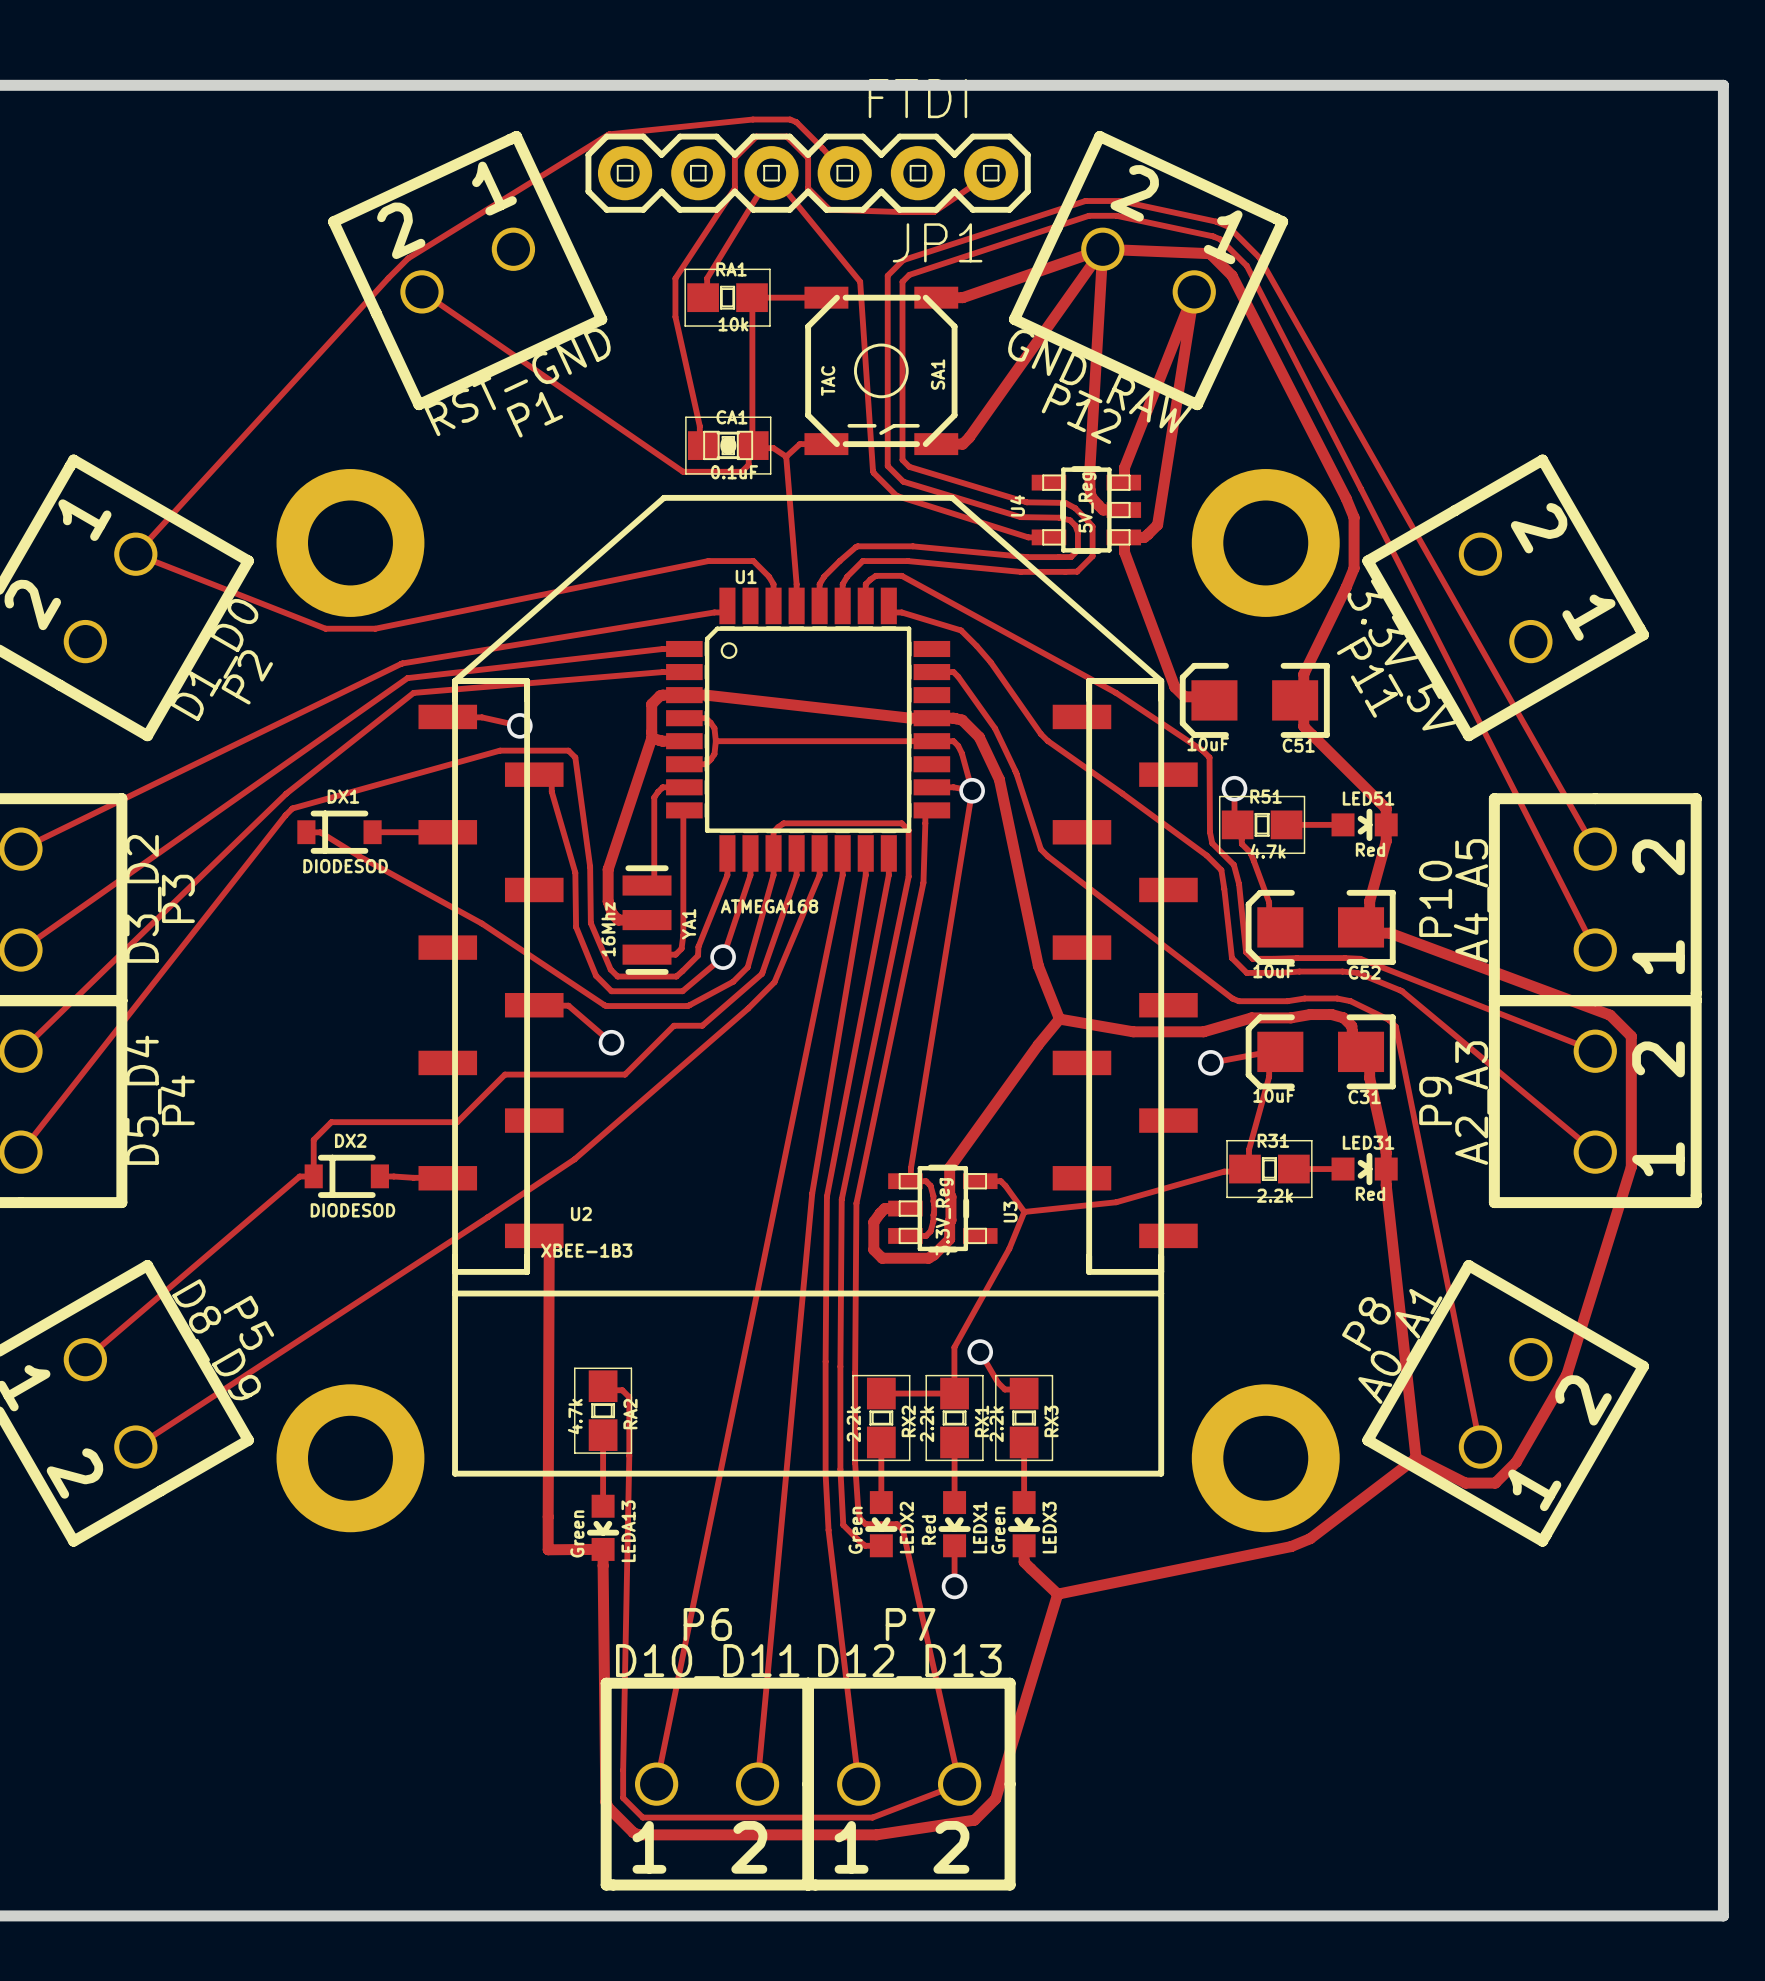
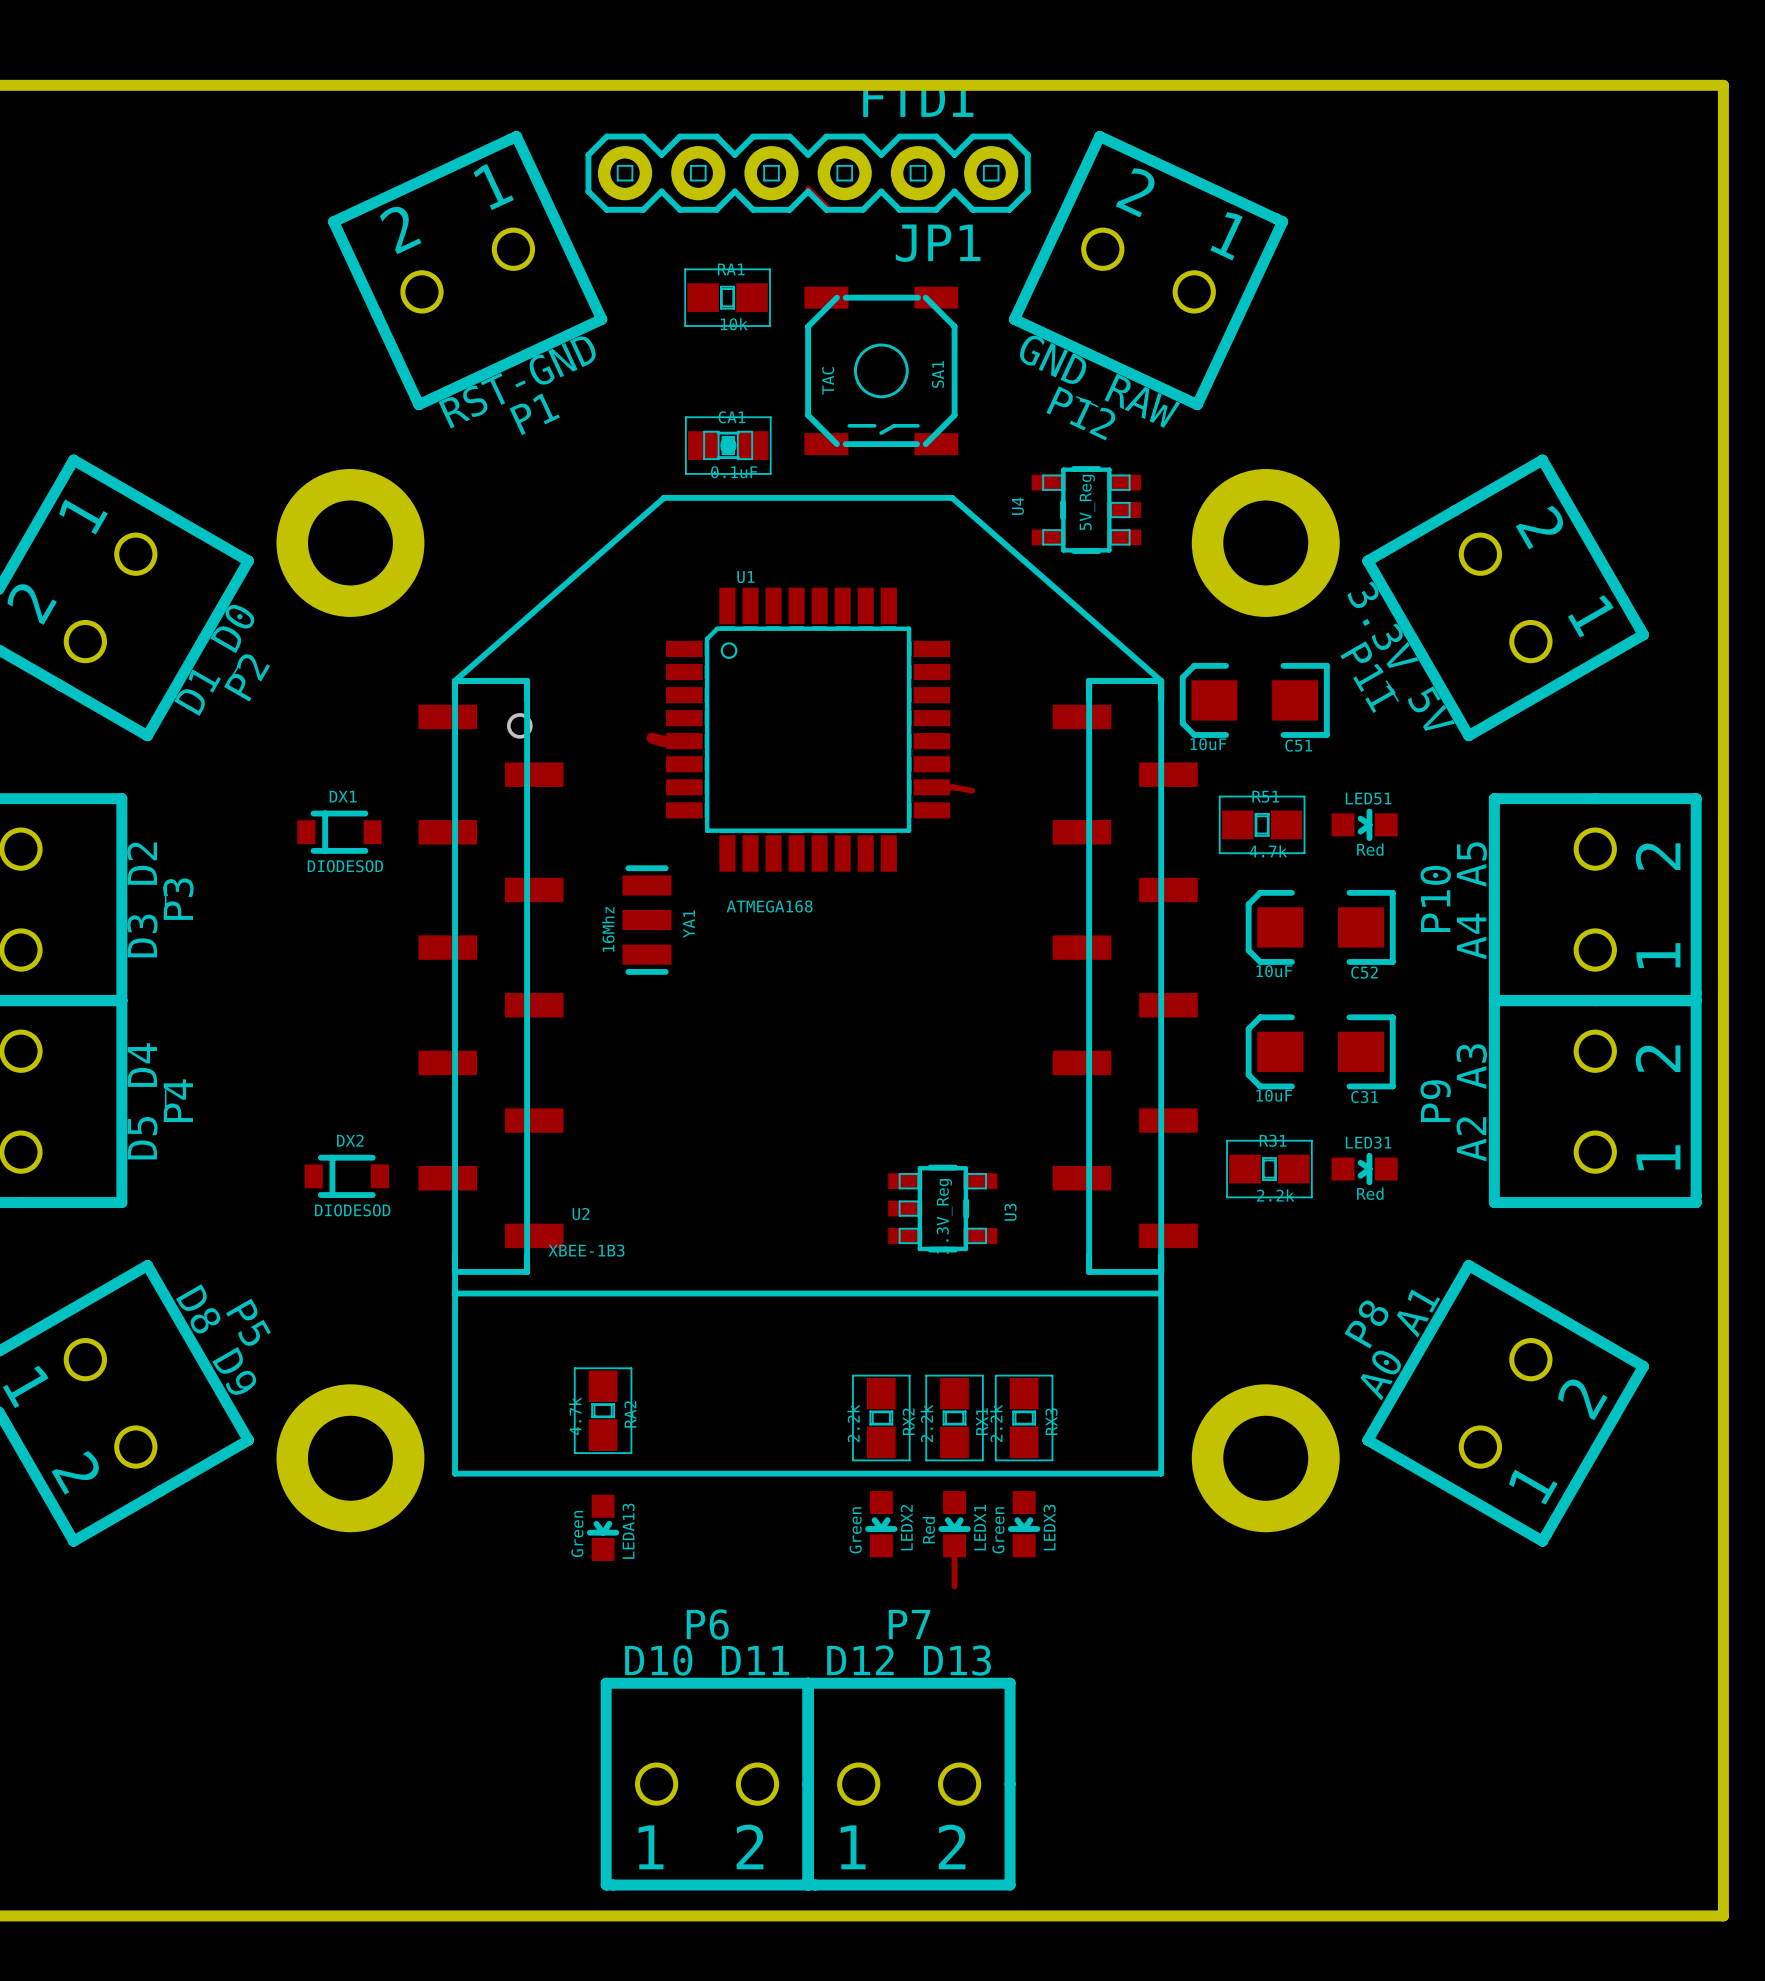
track: (756, 136) (734, 157) (734, 188) -> none
track: (786, 136) (808, 157) (808, 188) -> none
track: (844, 173) (796, 122) (790, 119) (752, 119) (608, 134) (408, 258) (135, 554) (325, 628) (375, 628) (708, 561) (753, 561) (769, 576) (773, 584) (773, 605) -> none
track: (991, 173) (933, 212) (829, 209) -> none
track: (734, 188) (675, 278) (675, 316) (703, 445) -> none
track: (1102, 249) (1209, 253) (1232, 275) (1346, 498) (1354, 517) (1354, 568) (1303, 674) (1303, 685) (1295, 700) (1303, 715) (1303, 726) (1386, 808) (1386, 841) (1369, 901) (1369, 912) (1361, 927) (1378, 933) (1390, 933) (1610, 1015) (1631, 1036) (1631, 1167) (1566, 1374) (1516, 1461) (1495, 1483) (1465, 1483) (1416, 1458) -> none
track: (1102, 249) (1089, 489) (1091, 496) (1103, 510) (1123, 510) -> none
track: (1102, 249) (969, 437) (962, 444) (936, 444) -> none
track: (1102, 249) (962, 297) (936, 297) -> none
track: (422, 291) (683, 471) (741, 471) (748, 464) (748, 457) (752, 445) -> none
track: (703, 297) (707, 286) (707, 278) (771, 173) (860, 281) (873, 472) (898, 496) (1028, 537) (1048, 537) -> none
track: (826, 297) (752, 297) (752, 445) -> none
track: (826, 444) (799, 444) (786, 456) -> none
track: (752, 445) (773, 448) (786, 456) -> none
track: (786, 456) (796, 584) (796, 605) -> none
track: (1123, 482) (1124, 467) (1194, 291) (1157, 524) (1144, 537) (1123, 537) (1124, 552) (1174, 687) (1184, 696) (1214, 700) -> none
track: (727, 605) (722, 612) (402, 663) (20, 849) -> none
track: (819, 605) (819, 584) (824, 576) (857, 546) (912, 546) (1026, 557) (1071, 557) (1077, 550) (1077, 532) (1075, 525) (1070, 520) (1059, 517) (1020, 517) (903, 481) (887, 466) (887, 275) (903, 260) (1085, 201) (1120, 201) (1216, 221) (1228, 226) (1259, 257) (1595, 849) -> none
track: (842, 605) (842, 584) (847, 576) (862, 561) (907, 561) (1020, 571) (1077, 571) (1092, 556) (1092, 526) (1075, 508) (1065, 502) (1026, 502) (909, 466) (902, 460) (902, 281) (909, 274) (1088, 215) (1116, 215) (1220, 239) (1246, 265) (1595, 950) -> none
track: (865, 605) (865, 584) (870, 579) (875, 575) (901, 575) (1116, 692) (1202, 750) (1209, 757) (1209, 832) (1212, 843) (1233, 864) (1239, 883) (1246, 952) (1252, 958) (1360, 958) (1595, 1051) -> none
track: (888, 605) (893, 612) (901, 612) (961, 630) (990, 662) (1040, 734) (1047, 740) (1206, 855) (1221, 870) (1231, 958) (1246, 972) (1357, 972) (1401, 991) (1595, 1152) -> none
track: (684, 649) (662, 649) (407, 678) (20, 950) -> none
track: (684, 672) (662, 672) (413, 692) (286, 793) (20, 1051) -> none
track: (931, 672) (953, 672) (995, 728) (1016, 774) (1040, 849) (1232, 998) (1238, 1001) (1287, 1001) (1304, 998) (1337, 998) (1350, 1001) (1388, 1019) (1395, 1026) (1480, 1447) -> none
track: (447, 716) (481, 717) (519, 725) -> none
track: (684, 718) (706, 718) (714, 728) (715, 741) -> none
track: (715, 741) (714, 754) (706, 764) (684, 764) -> none
track: (715, 741) (953, 741) (961, 753) (972, 790) (910, 1176) (905, 1181) (926, 1181) (930, 1185) (934, 1203) (933, 1220) (930, 1231) (926, 1235) (905, 1235) -> none
track: (534, 774) (551, 783) (551, 791) (575, 872) (576, 927) (595, 975) (611, 991) (682, 991) (723, 957) (750, 875) (750, 853) -> none
track: (684, 787) (662, 787) (654, 797) (654, 878) (647, 885) -> none
track: (1234, 788) (1234, 813) (1241, 836) (1241, 844) (1250, 853) (1269, 902) (1269, 910) (1280, 927) -> none
via: (1234, 788) -> none
via: (972, 790) -> none
track: (684, 810) (681, 948) (675, 954) (647, 954) -> none
track: (931, 810) (925, 815) (923, 882) (856, 1203) (855, 1463) (859, 1518) (865, 1524) (897, 1524) (902, 1530) (959, 1784) (872, 1817) (642, 1817) (623, 1797) (629, 1397) (622, 1390) (614, 1390) (603, 1386) -> none
track: (1286, 824) (1343, 824) -> none
track: (306, 832) (320, 832) (358, 855) (481, 923) (604, 1005) (687, 1006) (733, 981) (747, 967) (773, 875) (773, 831) (778, 827) (783, 823) (901, 823) (908, 830) (908, 876) (841, 1199) (840, 1469) (843, 1525) (865, 1545) (881, 1545) -> none
track: (372, 832) (447, 832) -> none
track: (727, 853) (727, 875) (698, 946) (698, 955) (676, 976) (617, 976) (610, 969) (590, 923) (590, 866) (575, 757) (568, 750) (500, 750) (292, 808) (20, 1152) -> none
track: (796, 853) (796, 875) (761, 973) (702, 1025) (673, 1025) (625, 1074) (504, 1074) (457, 1122) (331, 1122) (313, 1139) (313, 1176) (299, 1176) (85, 1359) -> none
track: (819, 853) (819, 875) (774, 982) (748, 1008) (574, 1159) (135, 1447) -> none
track: (842, 853) (842, 875) (656, 1784) -> none
track: (865, 853) (865, 875) (812, 1193) (757, 1784) -> none
track: (888, 853) (888, 875) (826, 1196) (825, 1474) (828, 1530) (858, 1784) -> none
track: (647, 920) (618, 920) (612, 914) (608, 901) (608, 869) (651, 737) (651, 704) (660, 695) (706, 695) (910, 718) (953, 718) (962, 720) (979, 737) (999, 779) (1038, 965) (1059, 1019) -> none
via: (723, 957) -> none
track: (534, 1005) (568, 1005) (611, 1042) -> none
track: (1059, 1019) (1133, 1031) (1203, 1031) (1251, 1017) (1290, 1017) (1310, 1014) (1331, 1014) (1343, 1017) (1351, 1026) (1352, 1037) (1369, 1066) (1369, 1078) (1386, 1152) (1386, 1185) (1416, 1458) -> none
track: (1059, 1019) (1038, 1044) (949, 1167) (949, 1239) (928, 1258) (882, 1258) (873, 1249) (873, 1222) (880, 1213) (884, 1208) (905, 1208) -> none
via: (611, 1042) -> none
track: (1210, 1062) (1269, 1051) (1280, 1051) (1269, 1069) (1269, 1076) (1244, 1169) (1224, 1171) (1116, 1202) (1024, 1211) -> none
via: (1210, 1062) -> none
track: (1293, 1169) (1343, 1169) -> none
track: (379, 1176) (447, 1178) -> none
track: (980, 1181) (1000, 1181) (1024, 1211) -> none
track: (1024, 1211) (1009, 1248) (954, 1347) (954, 1393) (881, 1393) -> none
track: (534, 1235) (549, 1242) (548, 1549) (603, 1549) (605, 1802) (608, 1807) (633, 1832) (638, 1834) (876, 1834) (974, 1820) (995, 1799) (1057, 1594) -> none
track: (980, 1352) (997, 1382) (1004, 1389) (1012, 1389) (1024, 1393) -> none
via: (980, 1352) -> none
track: (603, 1435) (603, 1506) -> none
track: (881, 1442) (881, 1502) -> none
track: (954, 1442) (954, 1502) -> none
track: (1024, 1442) (1024, 1502) -> none
track: (1416, 1458) (1310, 1538) (1291, 1546) (1057, 1594) -> none
track: (1024, 1545) (1024, 1562) (1057, 1594) -> none
via: (954, 1586) -> none

